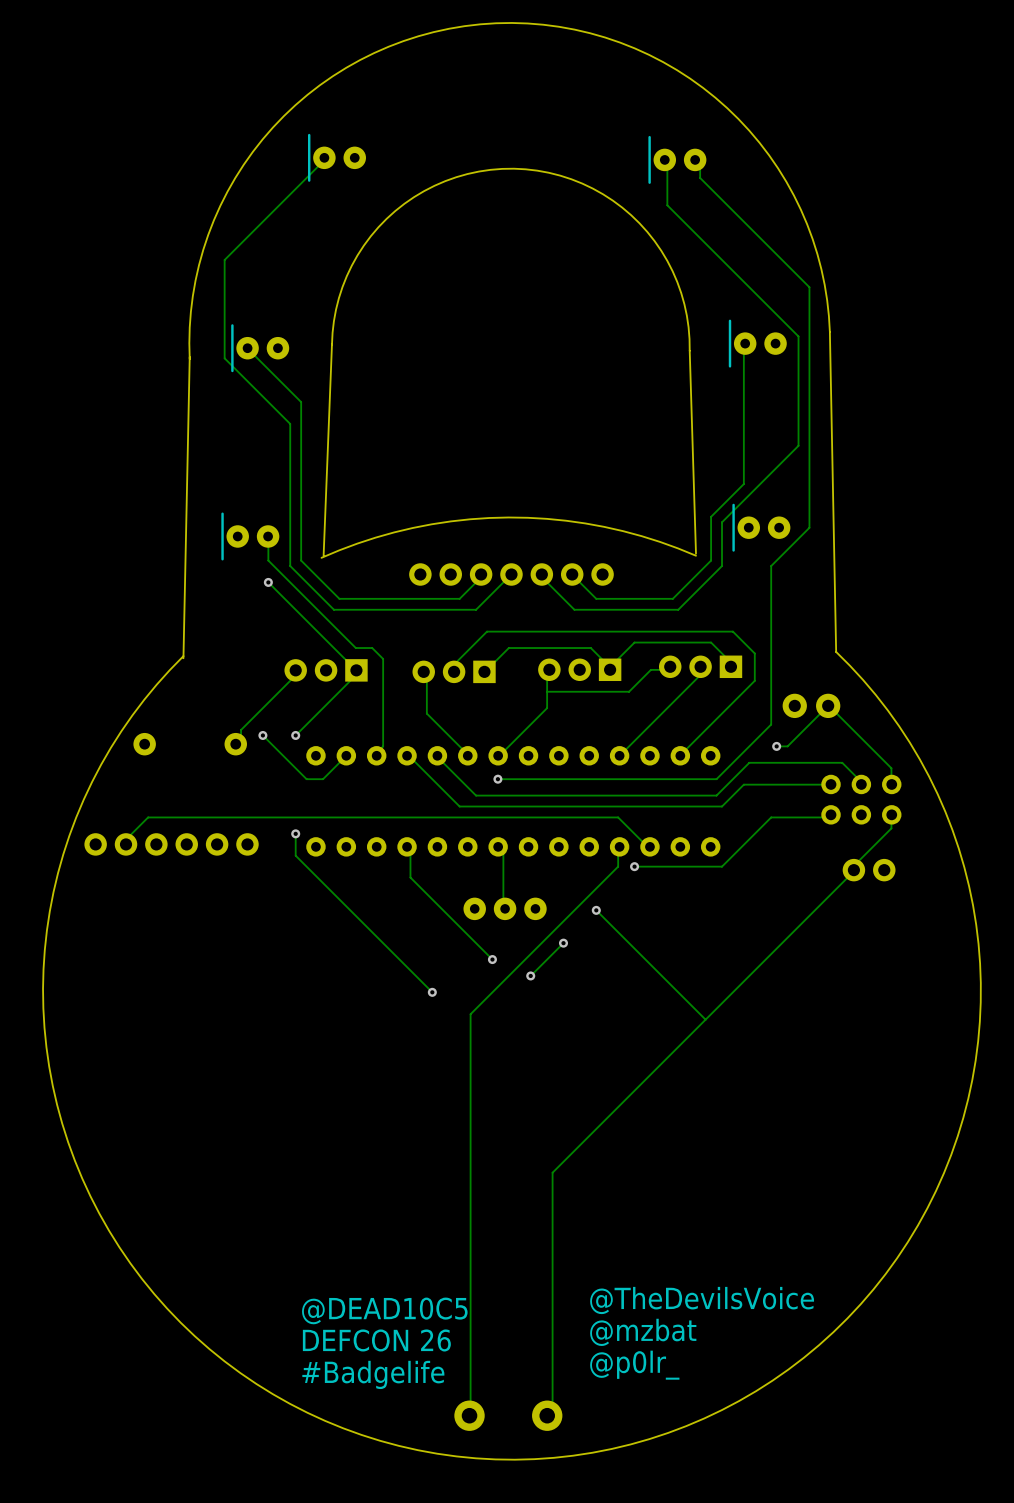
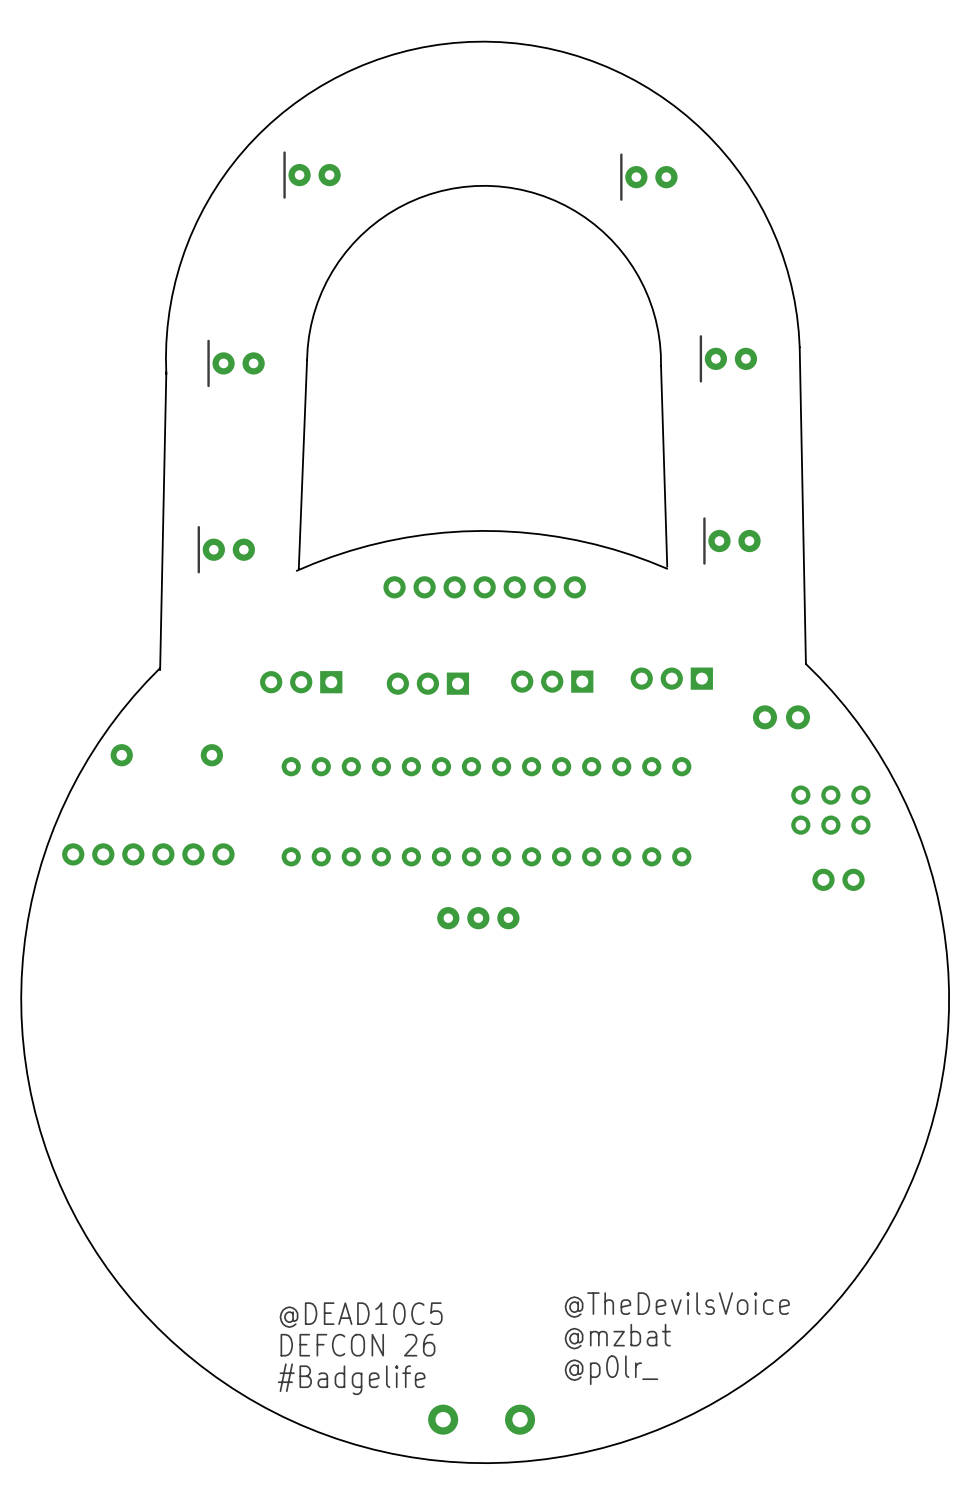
track: (324, 157) (323, 161) (224, 259) (224, 358) (290, 423) (290, 566) (333, 609) (476, 609) (511, 574) -> none
track: (664, 159) (667, 161) (667, 205) (798, 336) (798, 445) (722, 522) (722, 566) (678, 609) (574, 609) (541, 576) (541, 574) -> none
track: (695, 159) (700, 161) (700, 177) (809, 287) (809, 527) (771, 566) (771, 724) (716, 779) (497, 779) -> none
track: (745, 343) (743, 484) (711, 516) (711, 560) (672, 598) (596, 598) (572, 574) -> none
track: (247, 348) (301, 402) (301, 560) (339, 598) (459, 598) (476, 582) (476, 576) (481, 574) -> none
track: (268, 536) (268, 560) (355, 648) (372, 648) (383, 658) (383, 746) (376, 755) -> none
track: (268, 582) (356, 670) (355, 675) (295, 735) -> none
via: (268, 582) -> none
track: (670, 666) (667, 669) (650, 669) (629, 691) (547, 691) -> none
track: (700, 666) (705, 669) (619, 755) -> none
track: (730, 666) (727, 664) (727, 658) (711, 642) (634, 642) (612, 664) (610, 669) (590, 648) (508, 648) (484, 671) -> none
track: (549, 669) (547, 669) (547, 708) (498, 755) -> none
track: (295, 670) (295, 675) (241, 730) (241, 740) (235, 744) -> none
track: (423, 671) (426, 675) (426, 713) (467, 755) -> none
track: (454, 671) (448, 669) (486, 631) (732, 631) (754, 653) (754, 680) (680, 755) -> none
track: (262, 735) (306, 779) (323, 779) (346, 755) -> none
via: (262, 735) -> none
via: (295, 735) -> none
track: (776, 746) (787, 746) (828, 705) (891, 768) (891, 784) -> none
via: (776, 746) -> none
track: (407, 755) (459, 806) (722, 806) (743, 784) (831, 784) -> none
track: (437, 755) (476, 795) (716, 795) (749, 762) (842, 762) (861, 784) -> none
via: (497, 779) -> none
track: (831, 814) (825, 817) (771, 817) (722, 866) (634, 866) -> none
track: (891, 814) (891, 828) (853, 866) (853, 872) (552, 1172) (552, 1413) (547, 1415) -> none
track: (295, 833) (295, 855) (432, 992) -> none
via: (295, 833) -> none
track: (126, 844) (126, 839) (148, 817) (618, 817) (645, 844) (649, 846) -> none
track: (407, 846) (410, 850) (410, 877) (492, 959) -> none
track: (498, 846) (503, 850) (503, 904) (505, 908) -> none
track: (619, 846) (618, 866) (470, 1014) (469, 1415) -> none
via: (634, 866) -> none
track: (596, 910) (705, 1019) -> none
via: (596, 910) -> none
track: (563, 943) (530, 975) -> none
via: (563, 943) -> none
via: (492, 959) -> none
via: (530, 975) -> none
via: (432, 992) -> none

